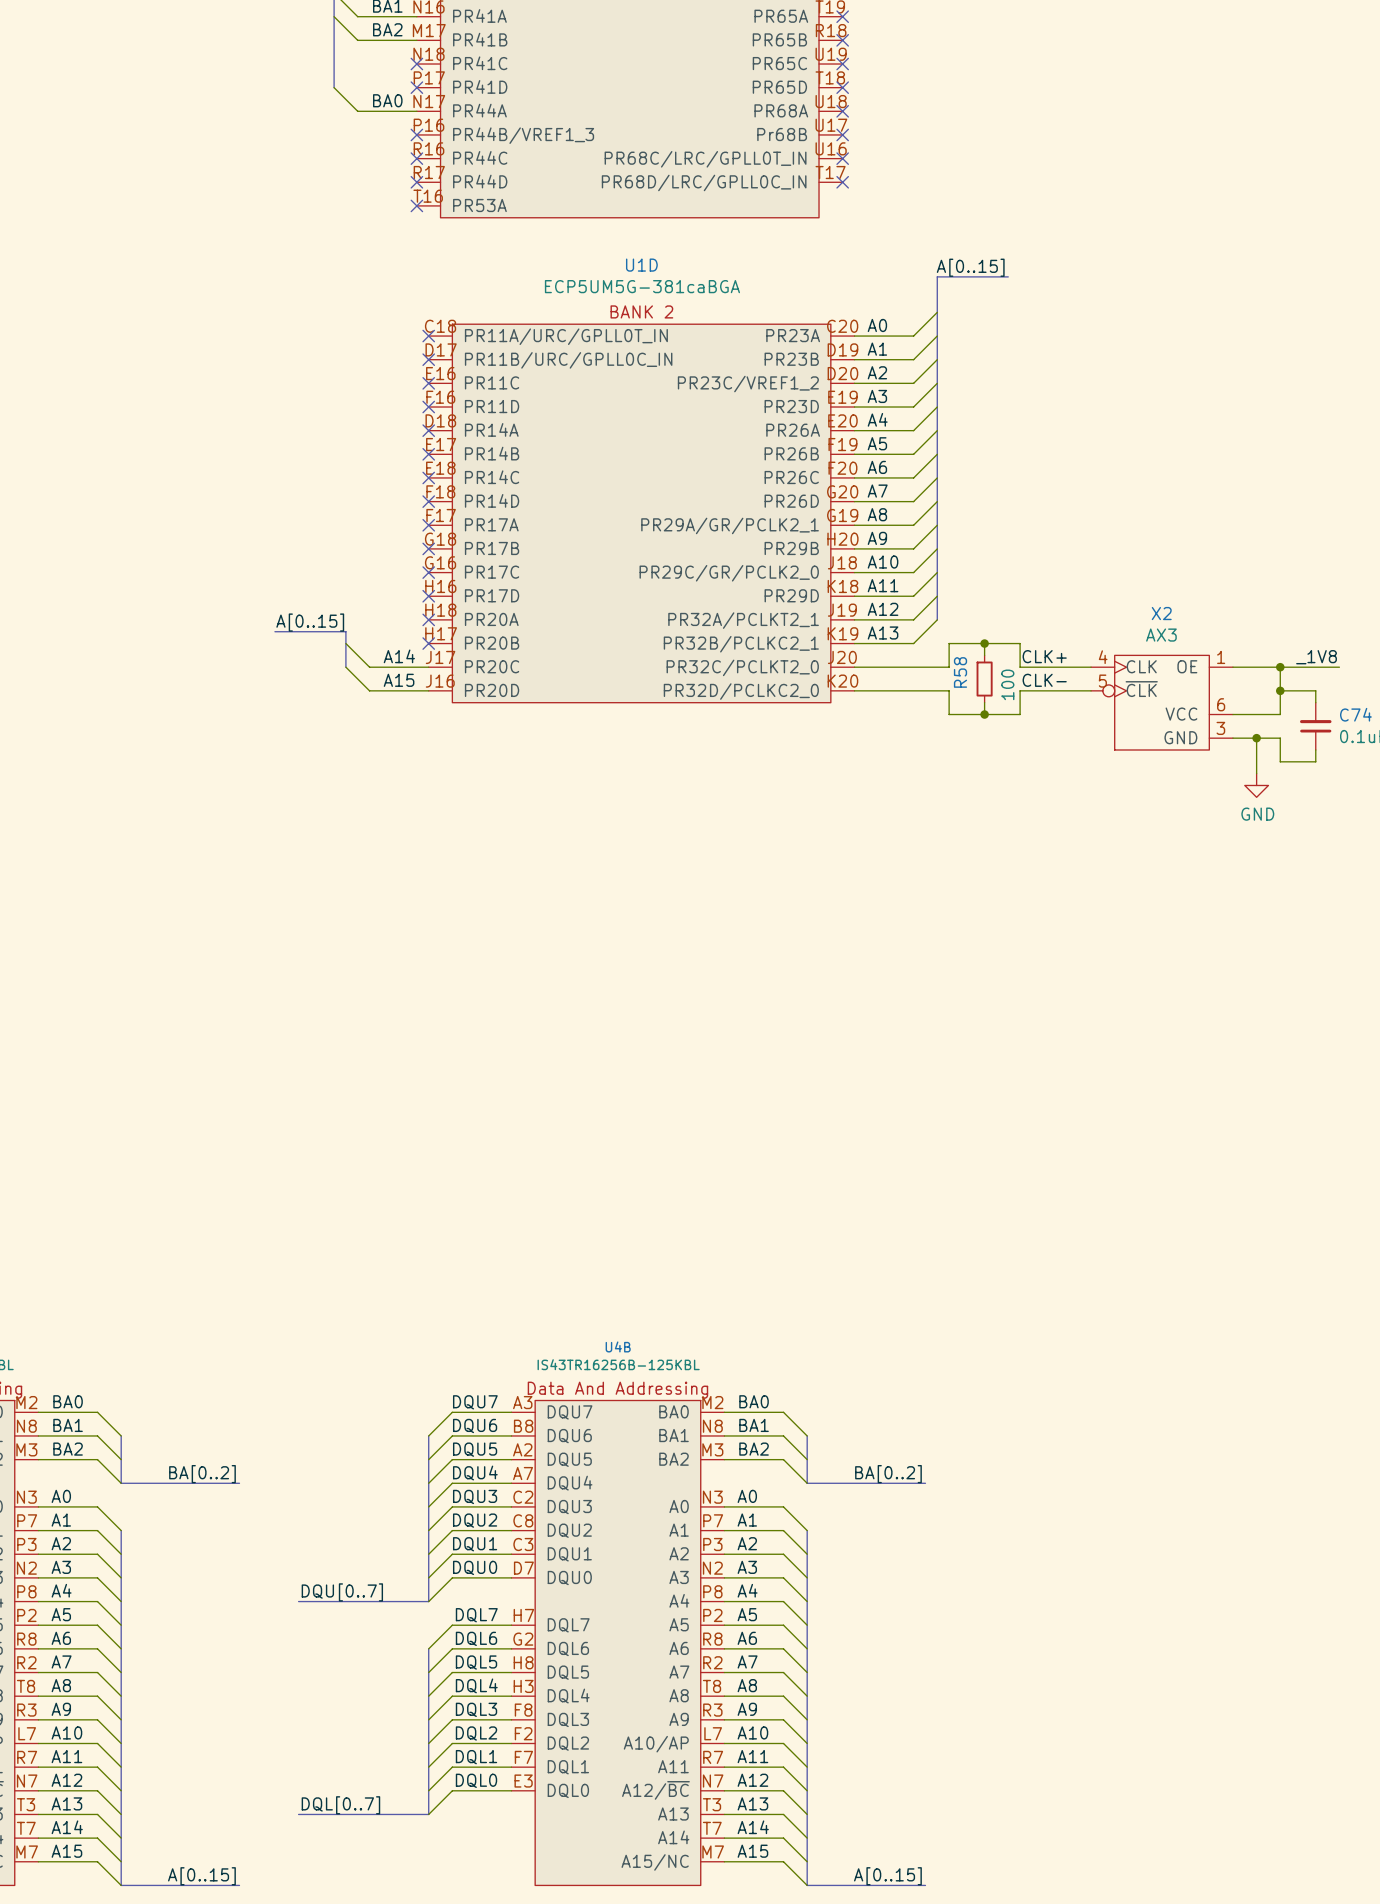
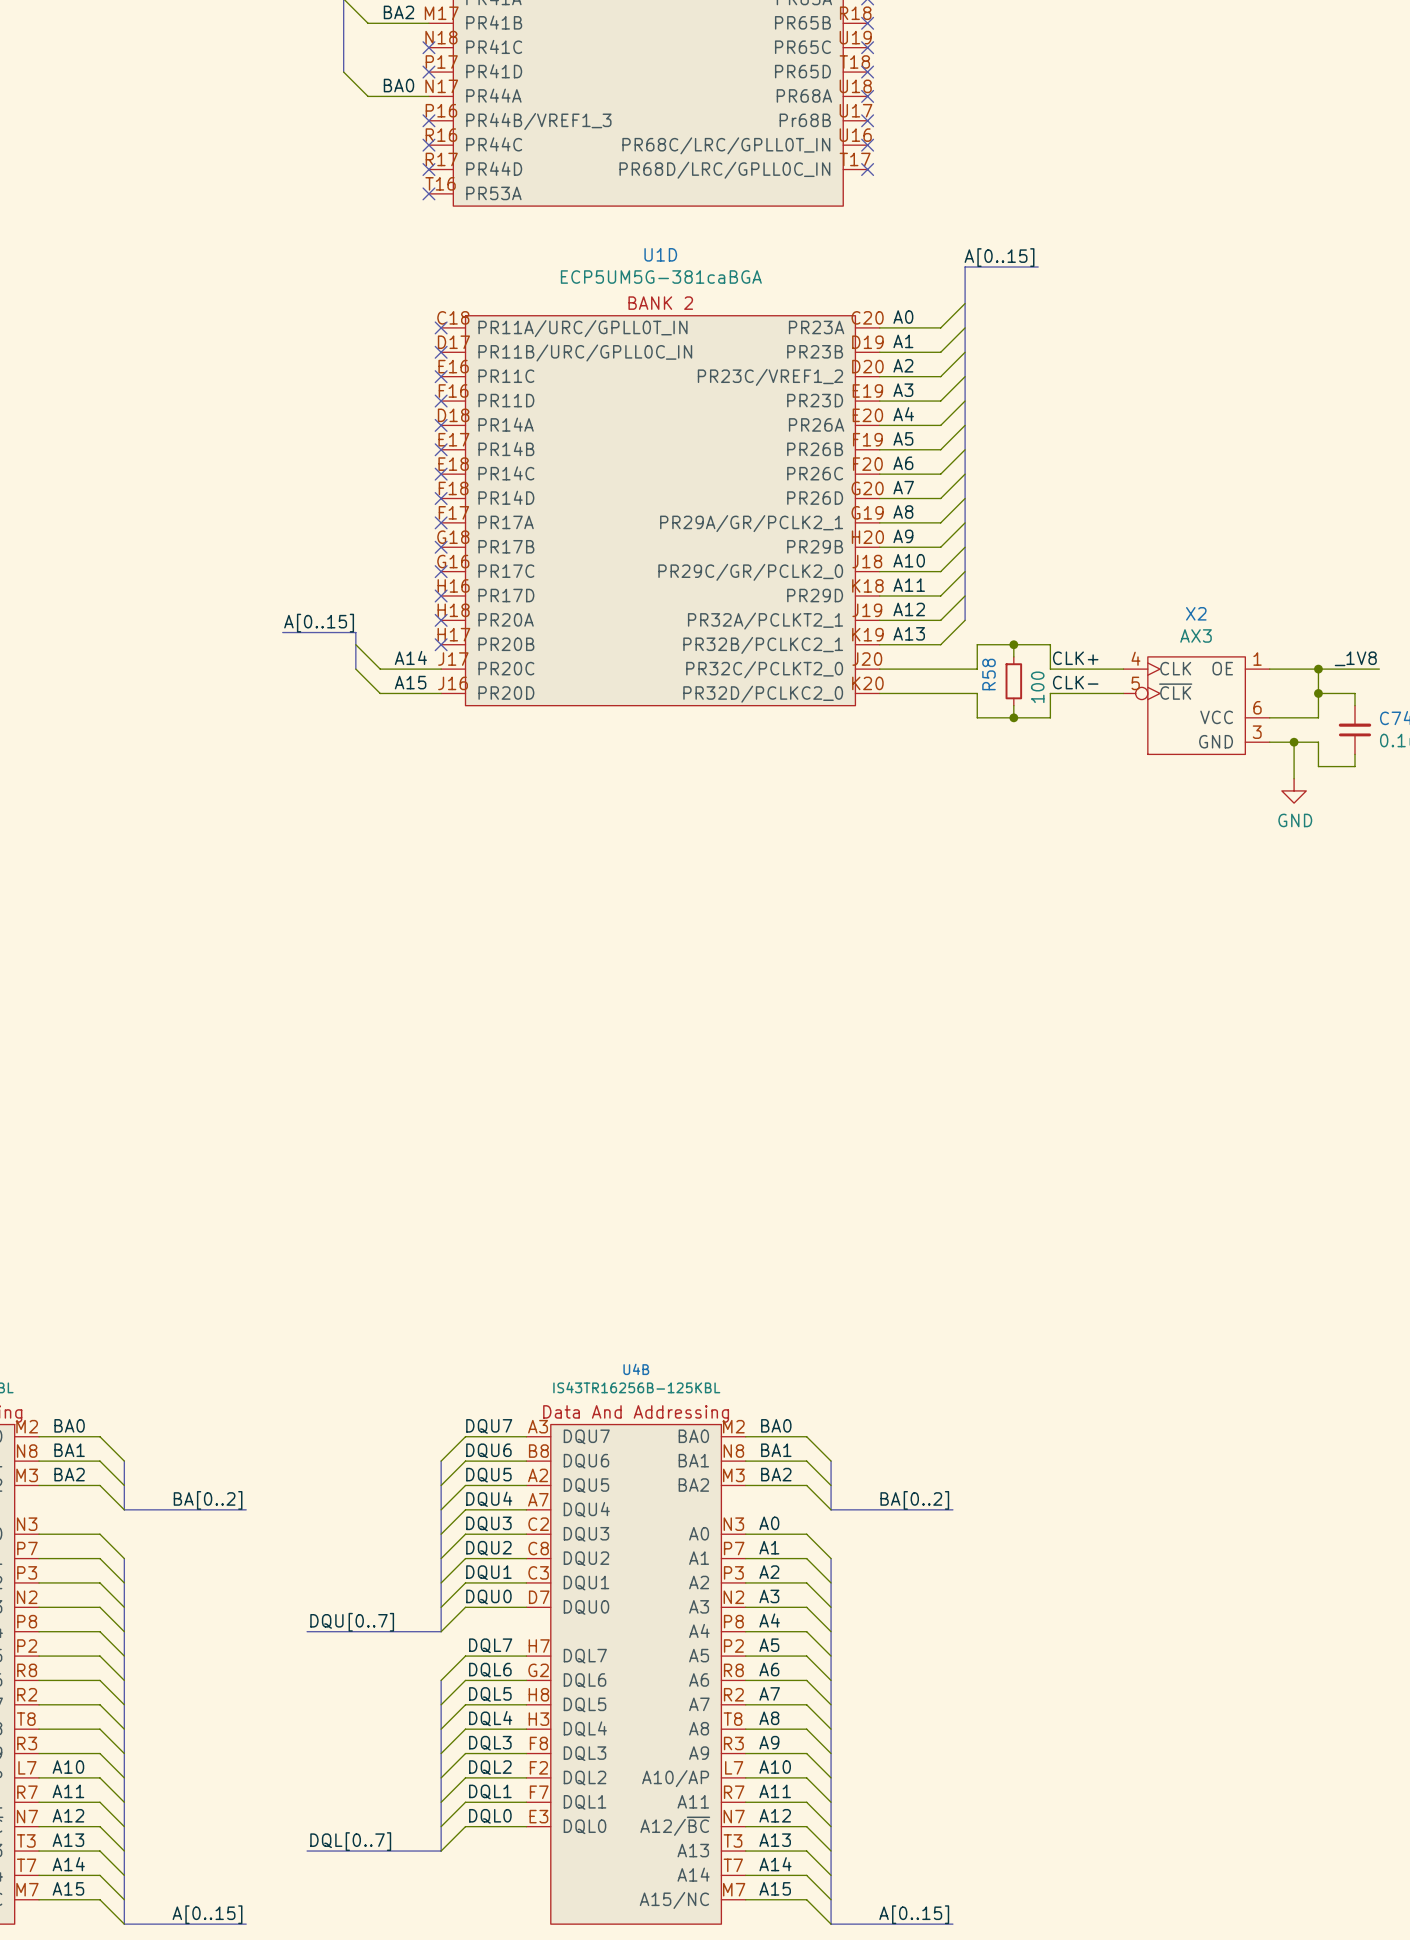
label: A0 (61, 1496) -> none
label: A1 (61, 1520) -> none
label: A2 (61, 1543) -> none
label: A3 (61, 1567) -> none
label: A4 (61, 1590) -> none
label: A5 (61, 1614) -> none
label: A6 (61, 1638) -> none
label: A7 (61, 1661) -> none
label: A8 (61, 1685) -> none
label: A9 (61, 1709) -> none

